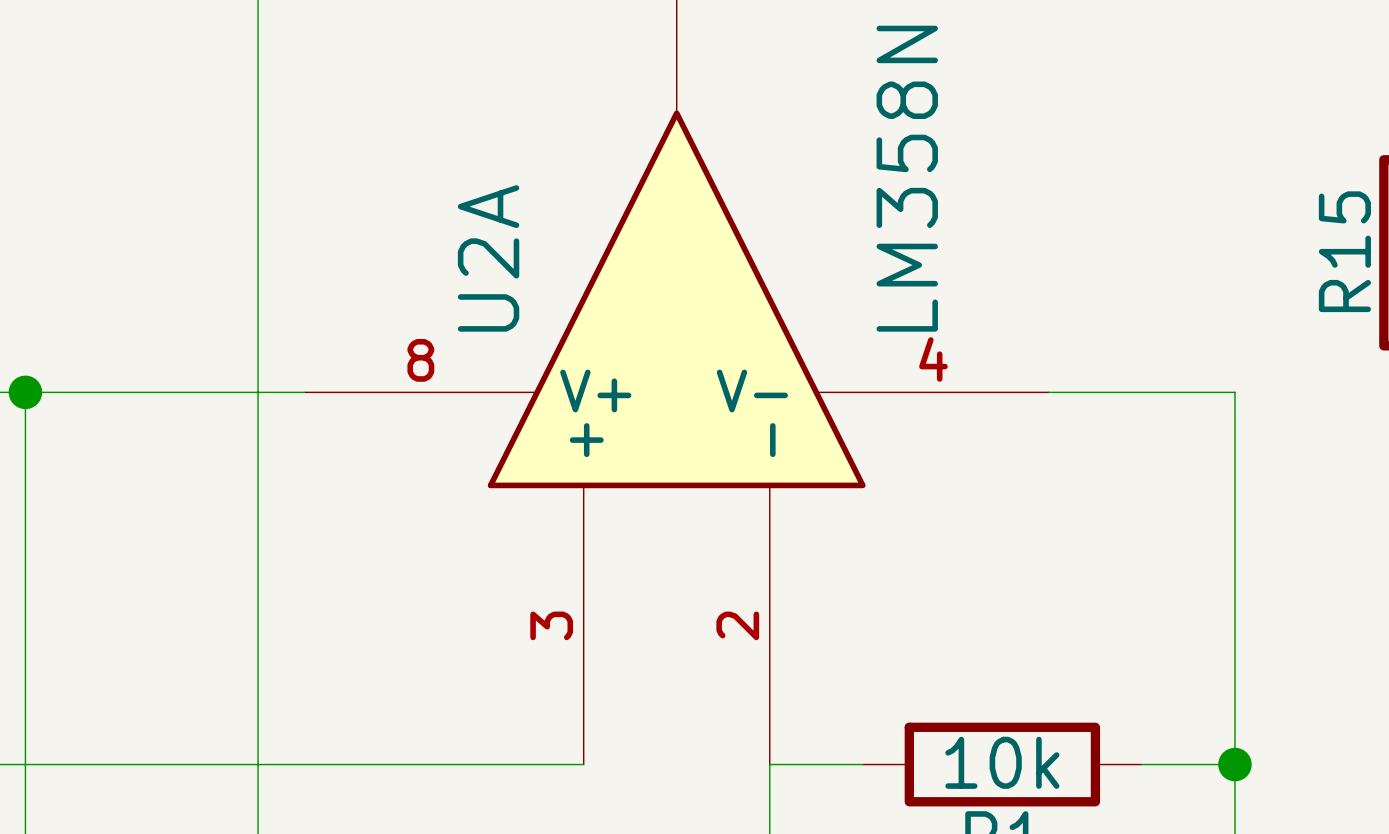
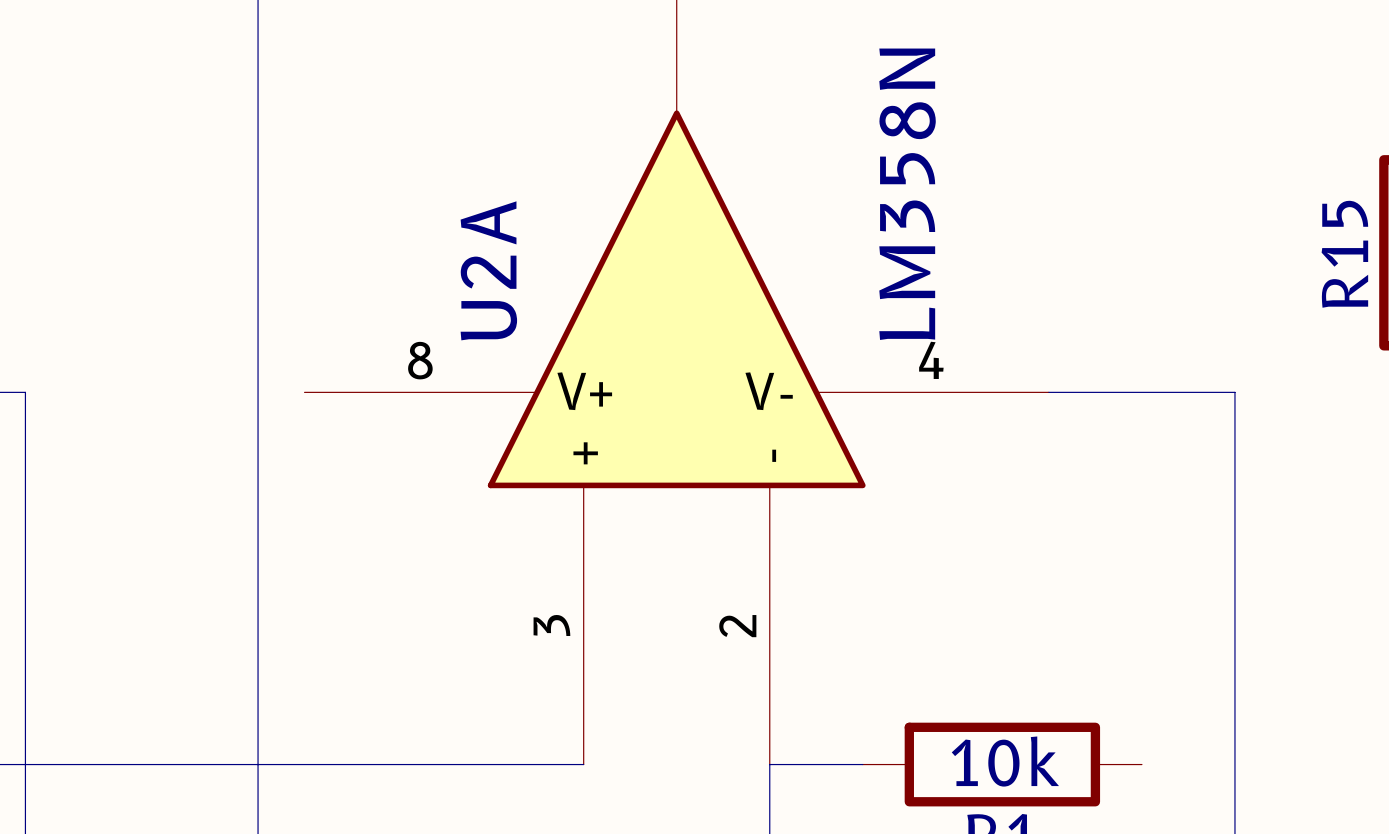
wire: (25, 392) (304, 392) -> none
junction: (25, 392) -> none
wire: (1141, 764) (1234, 764) -> none
junction: (1234, 764) -> none

